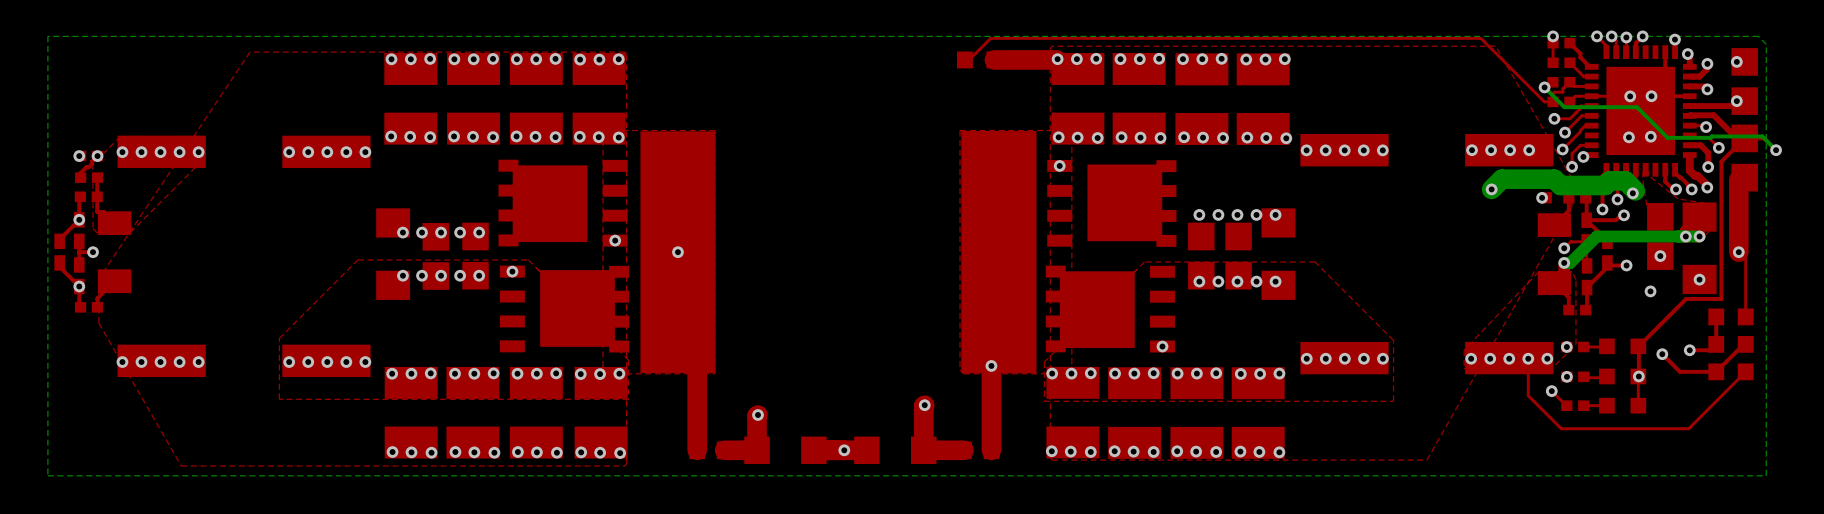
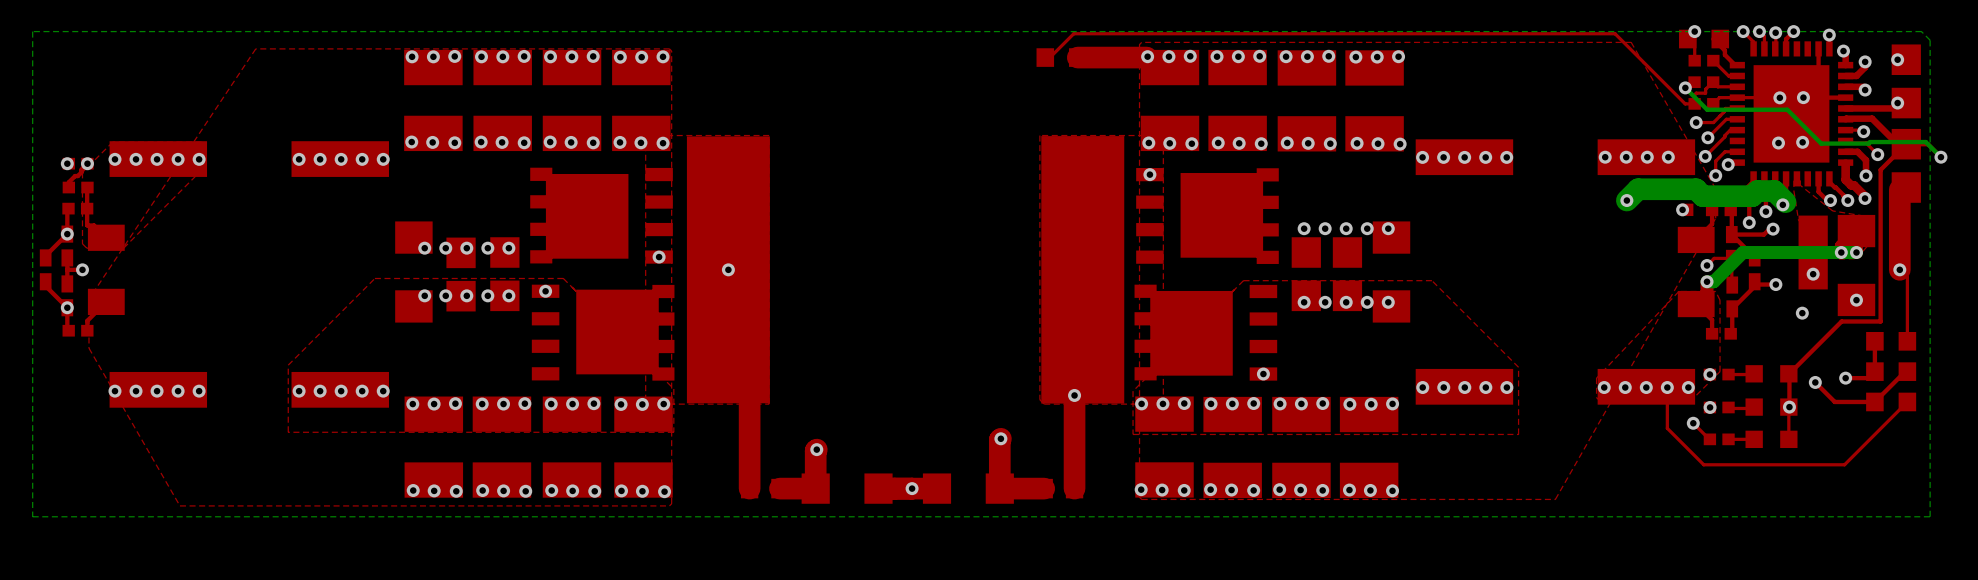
part footprint: [1547, 37, 1576, 49] -> [1679, 29, 1730, 49]

